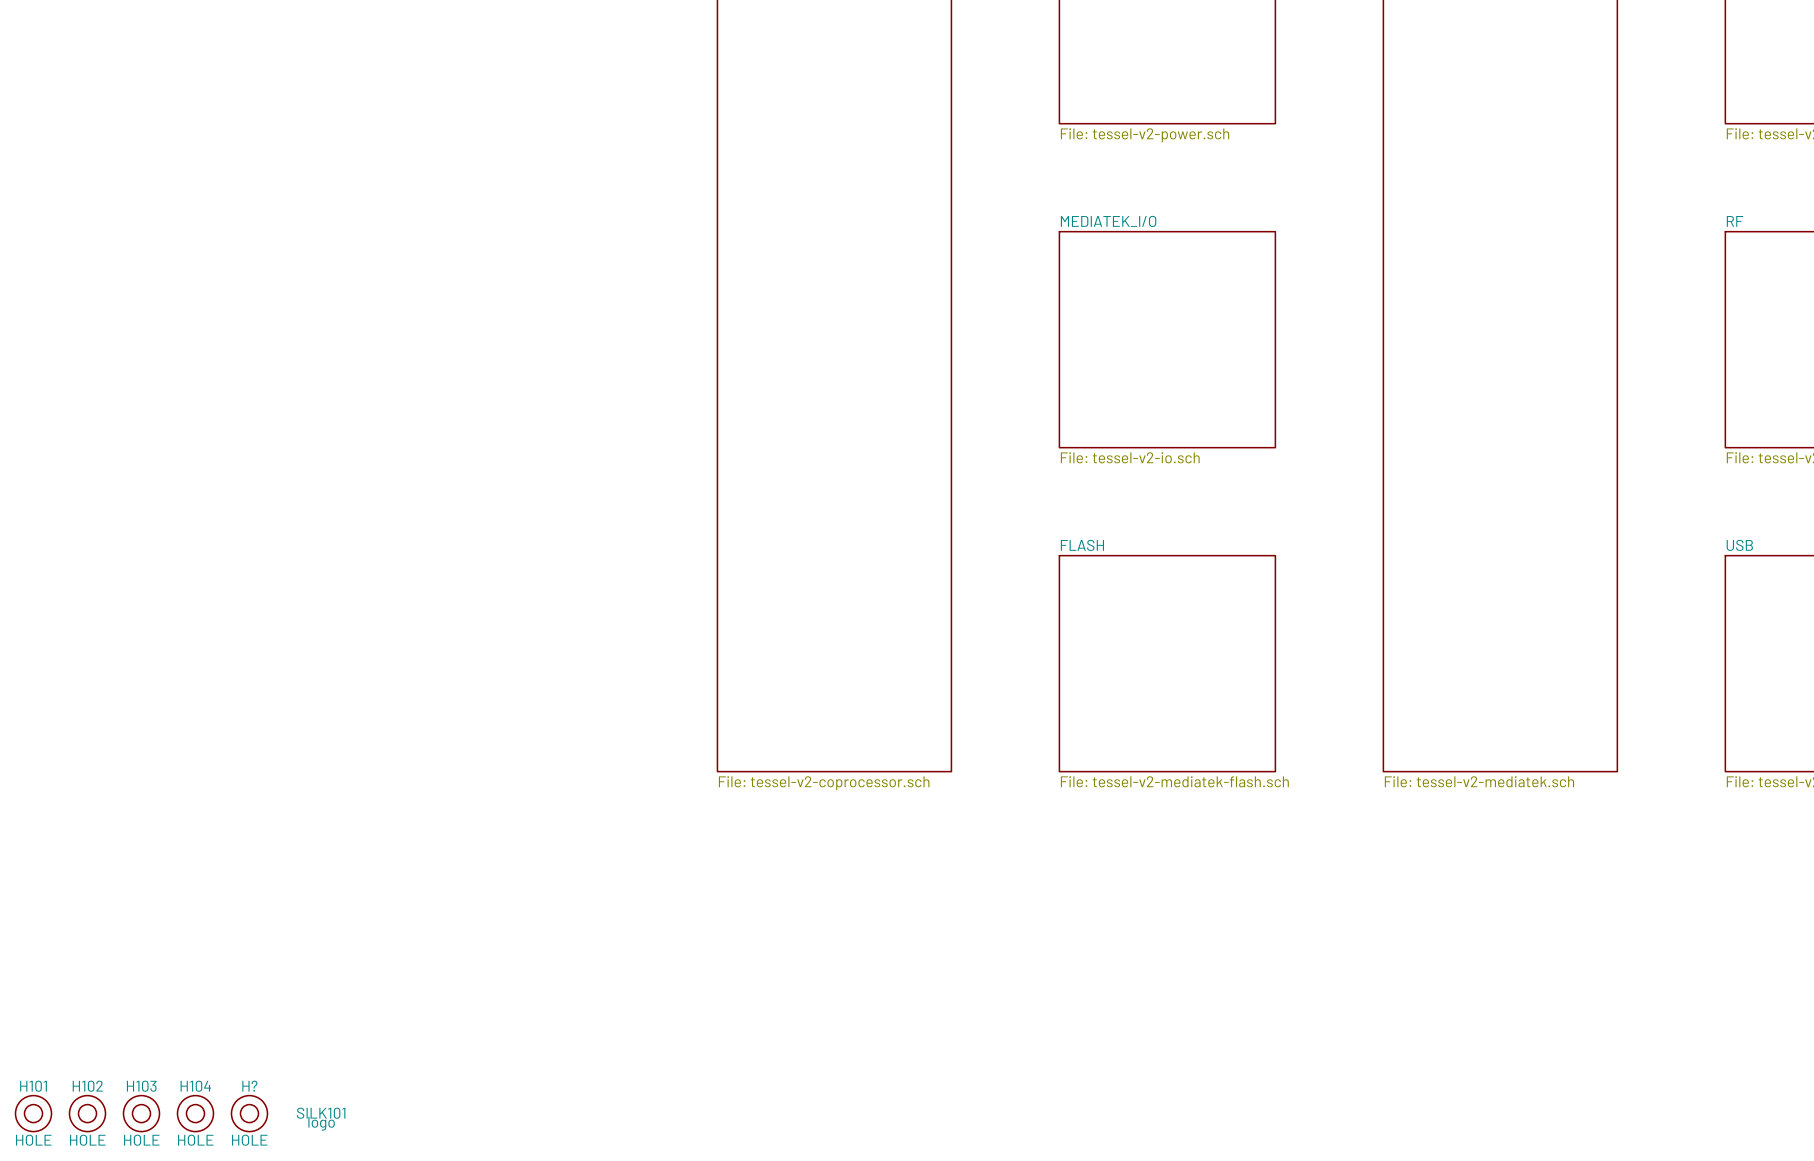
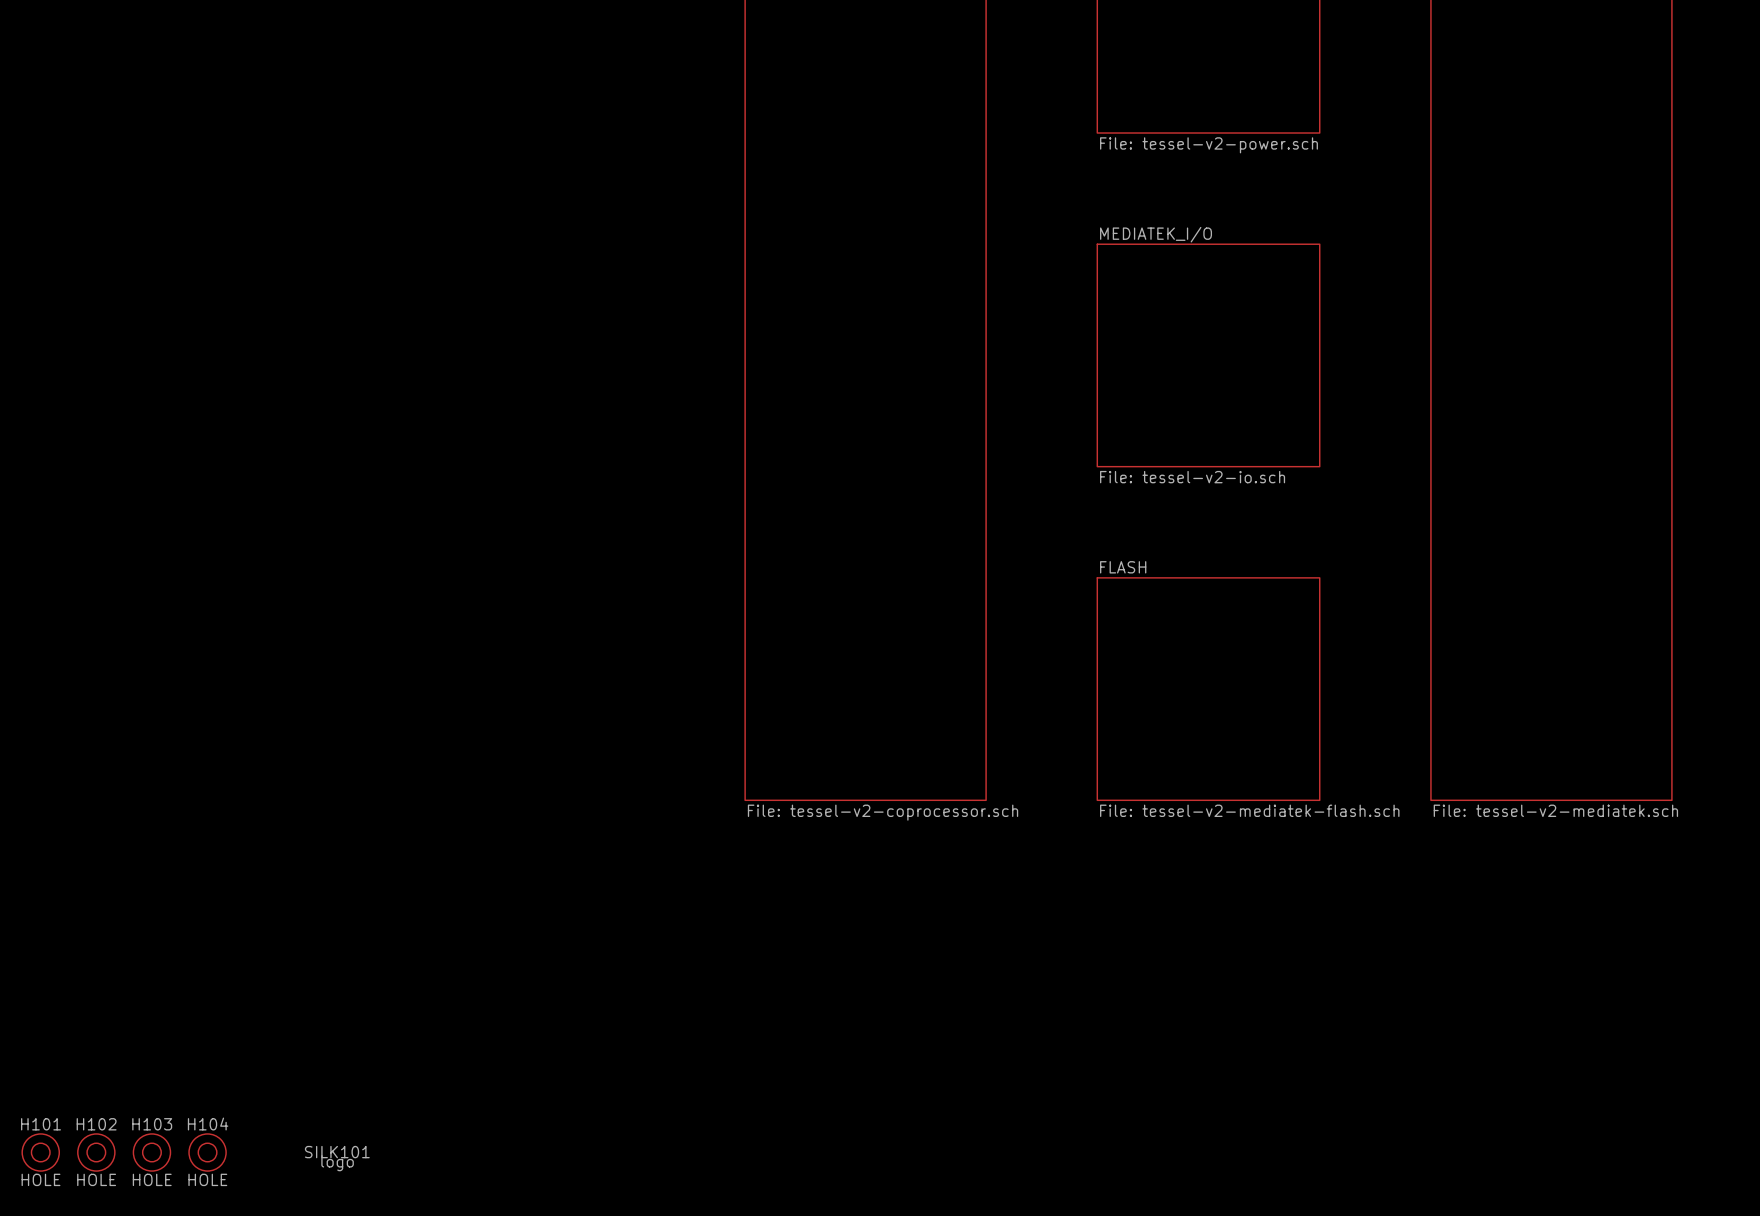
H?: HOLE (249, 1113) -> none

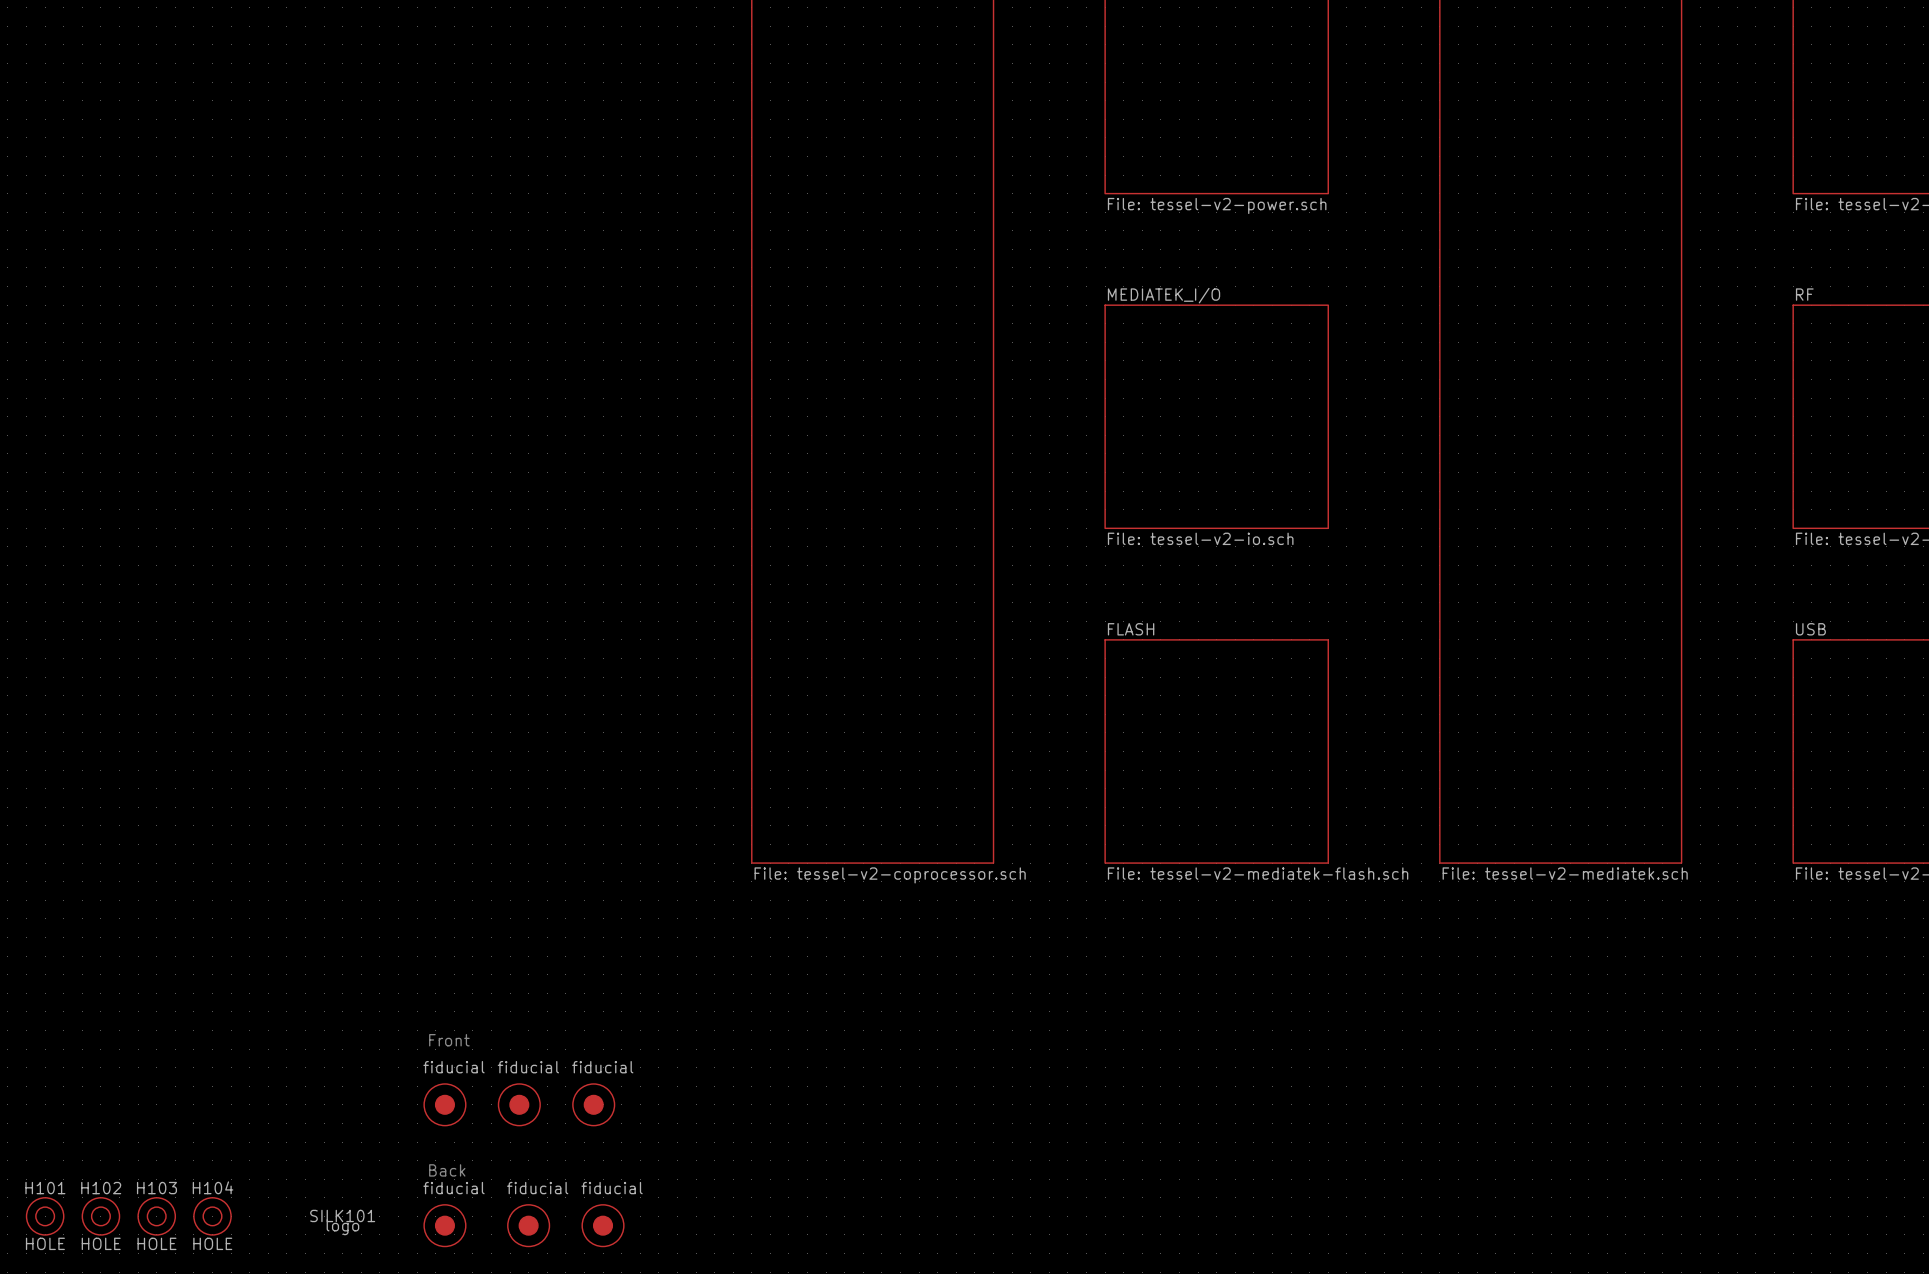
text: none -> Front (449, 1040)
part: none -> fiducial (444, 1104)
part: none -> fiducial (519, 1104)
part: none -> fiducial (593, 1104)
text: none -> Back (447, 1170)
part: none -> fiducial (444, 1225)
part: none -> fiducial (528, 1225)
part: none -> fiducial (603, 1225)

